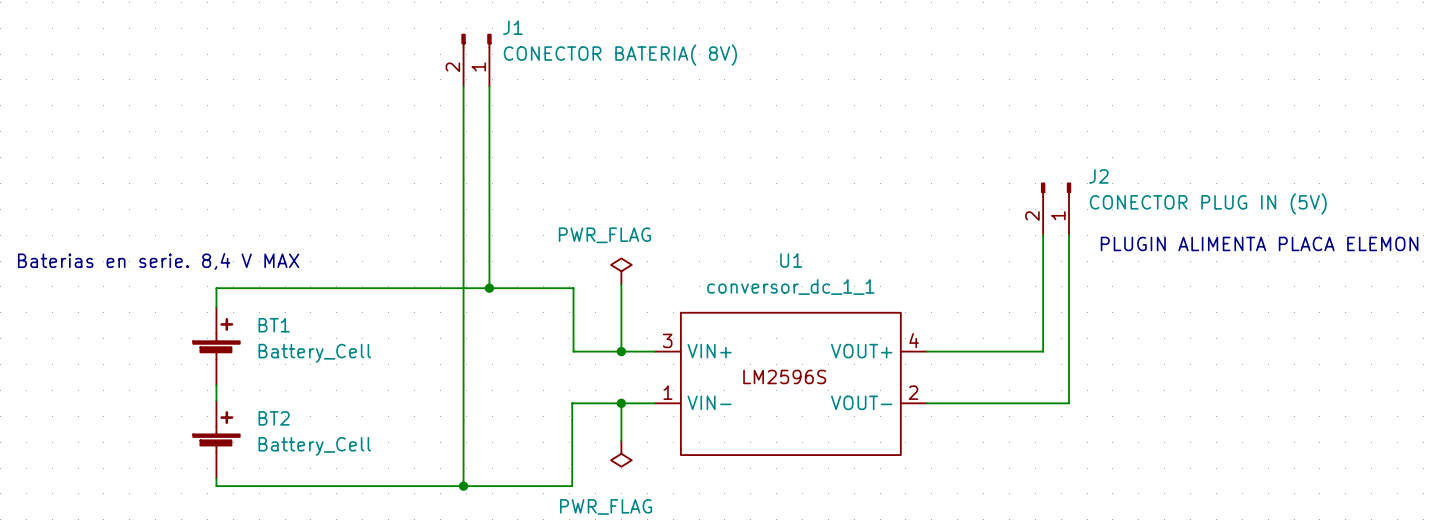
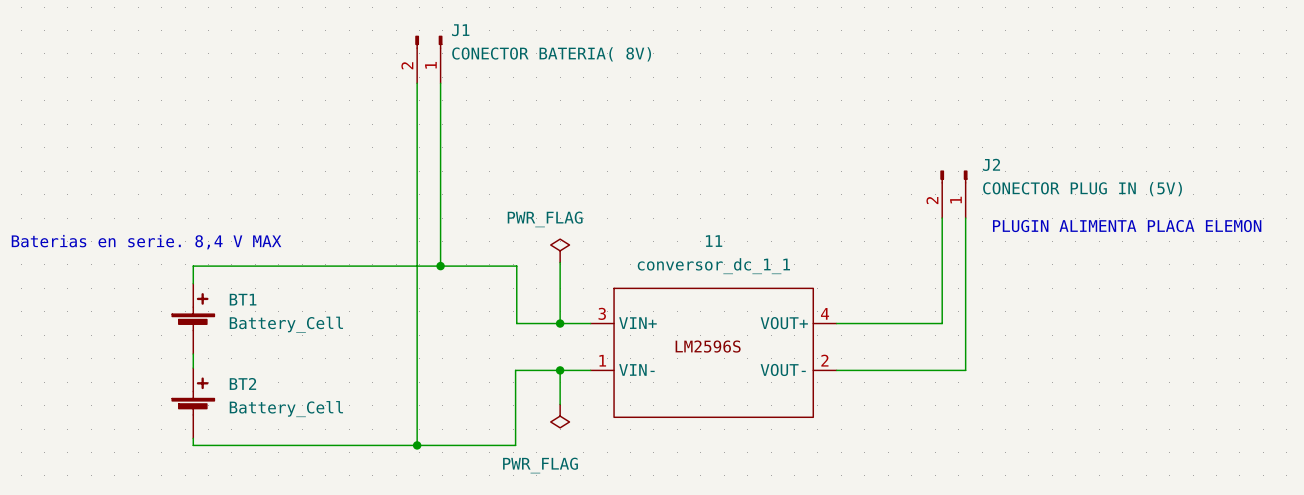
U1 name: U1 (791, 260) -> 11 (714, 241)

